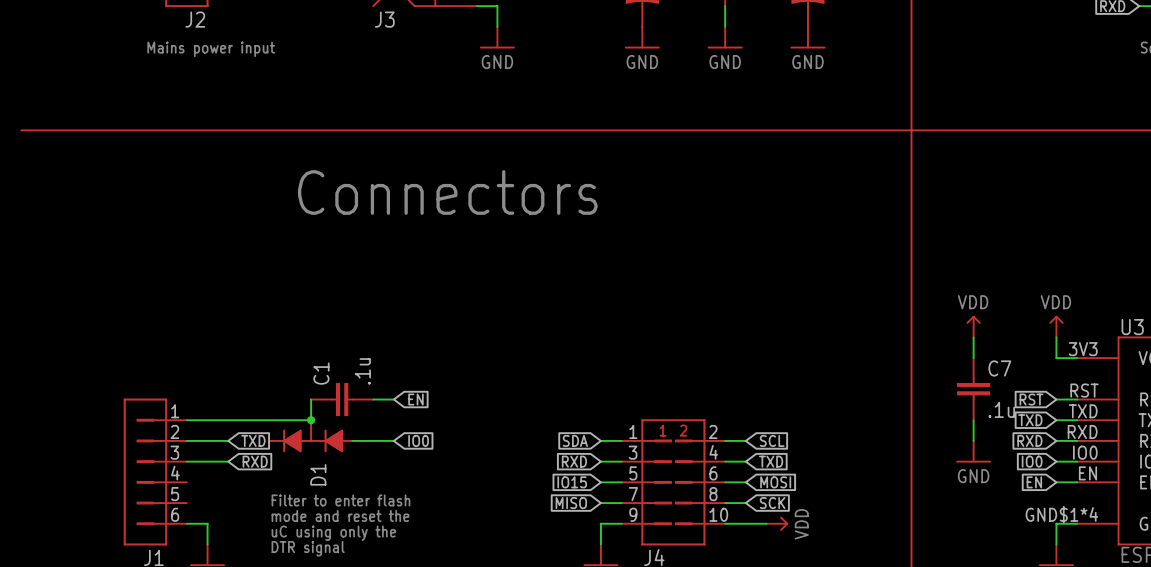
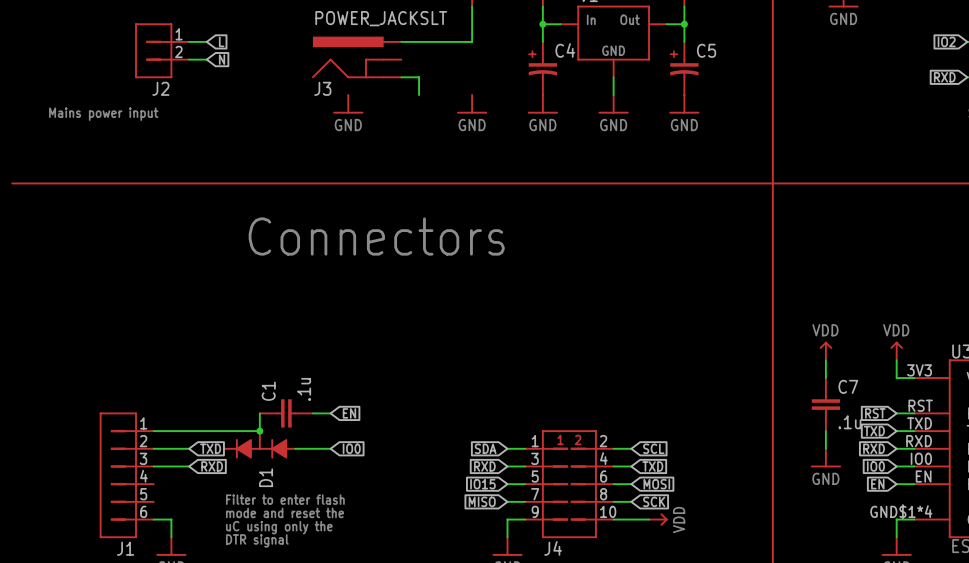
power symbol: none -> (348, 104)
power symbol: (497, 37) -> none
power symbol: none -> (472, 104)
text position: Mains power input (211, 49) -> Mains power input (103, 114)

